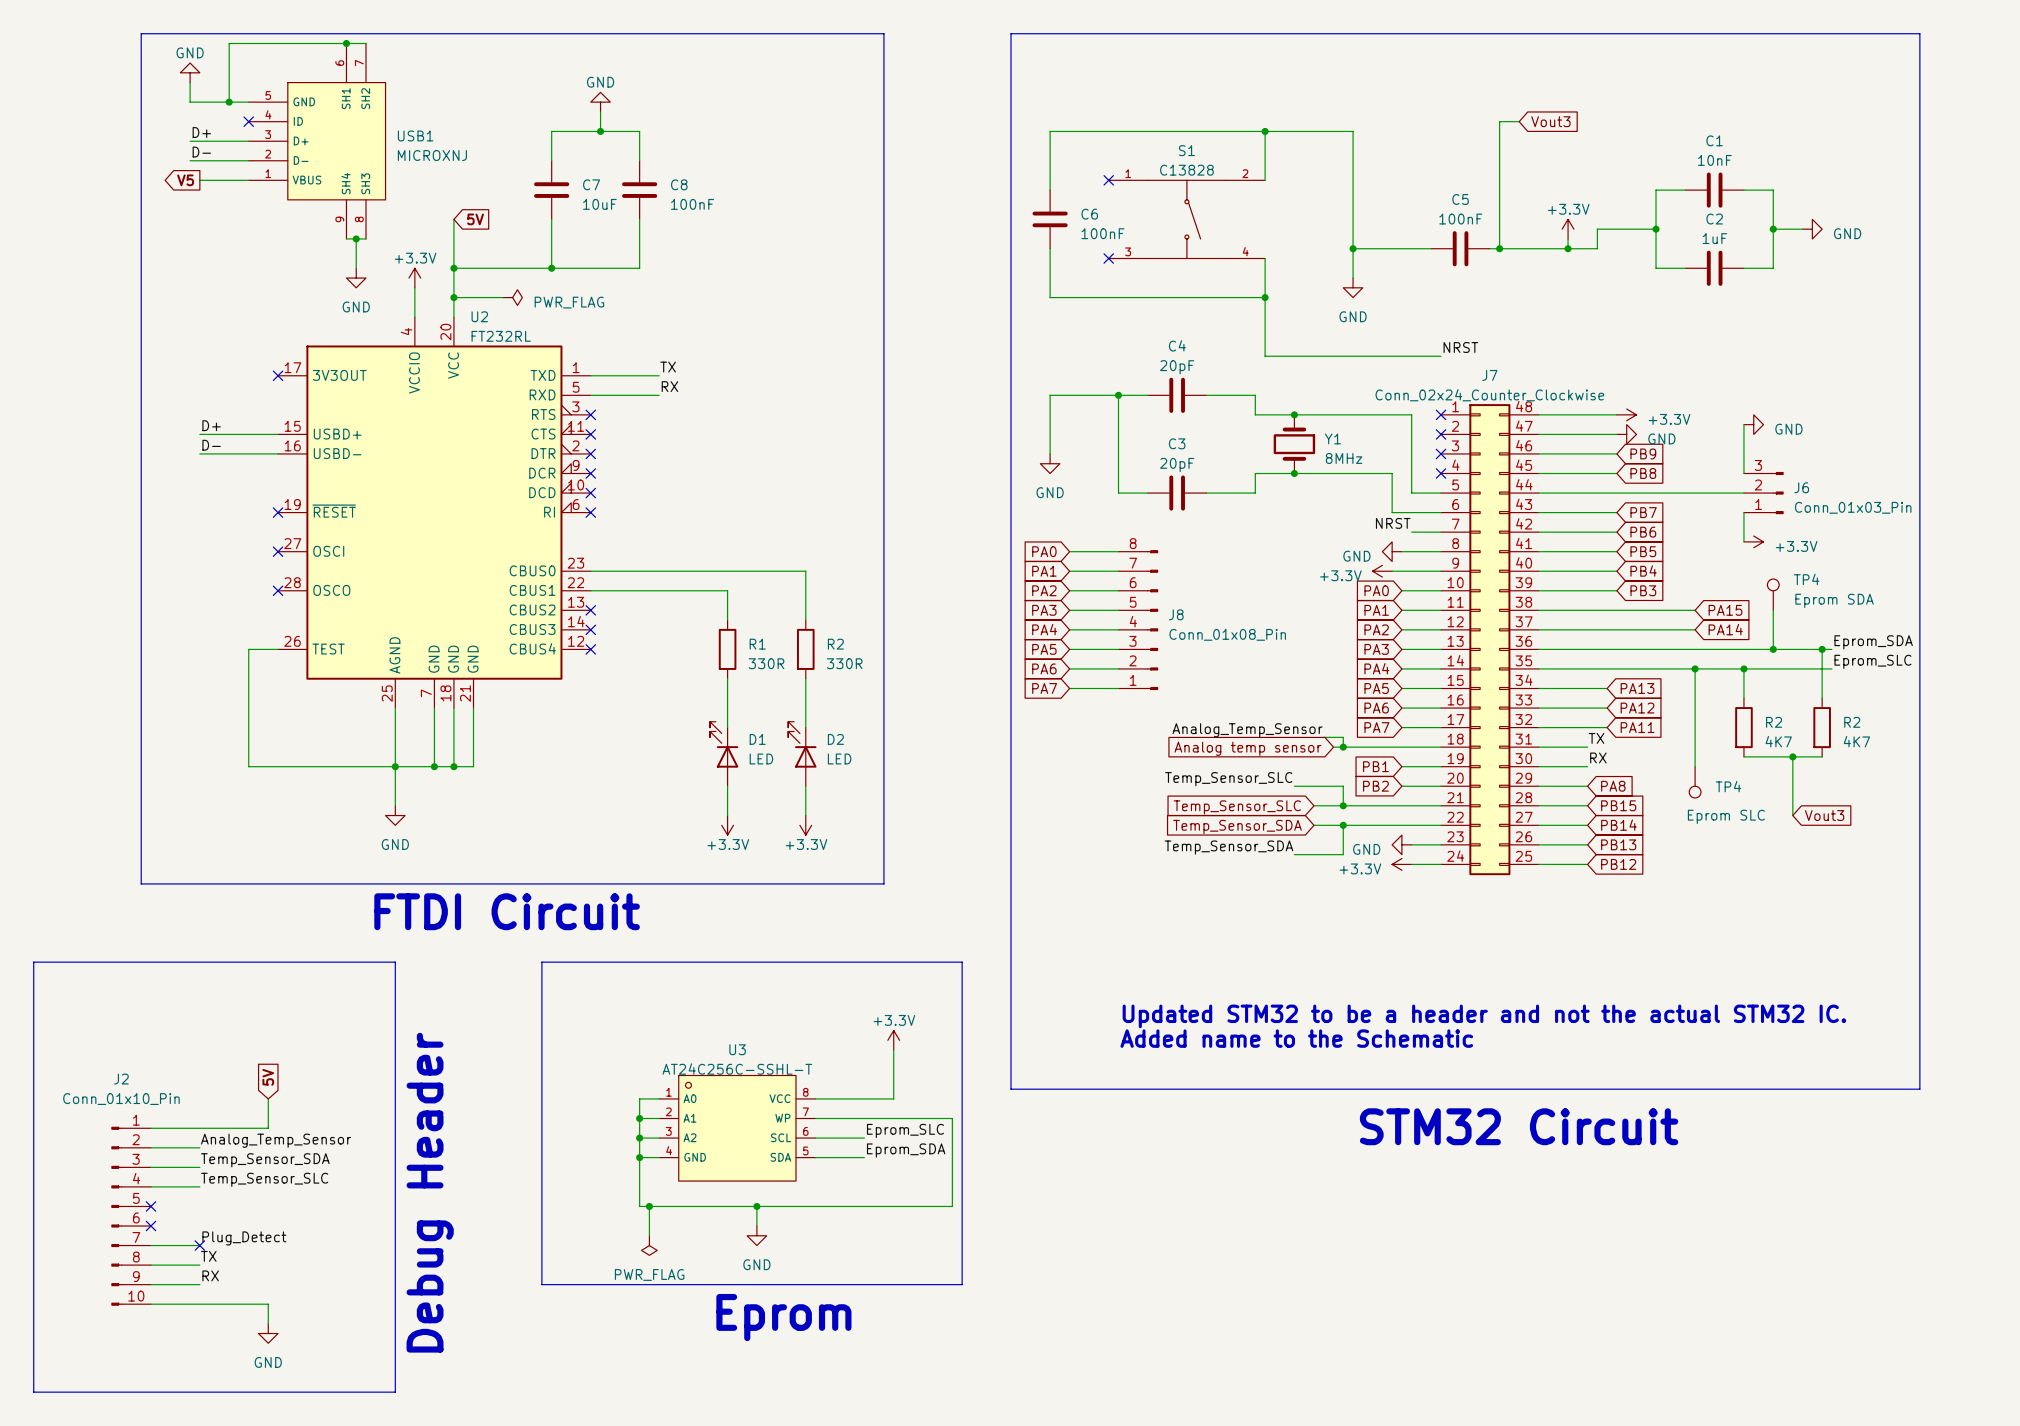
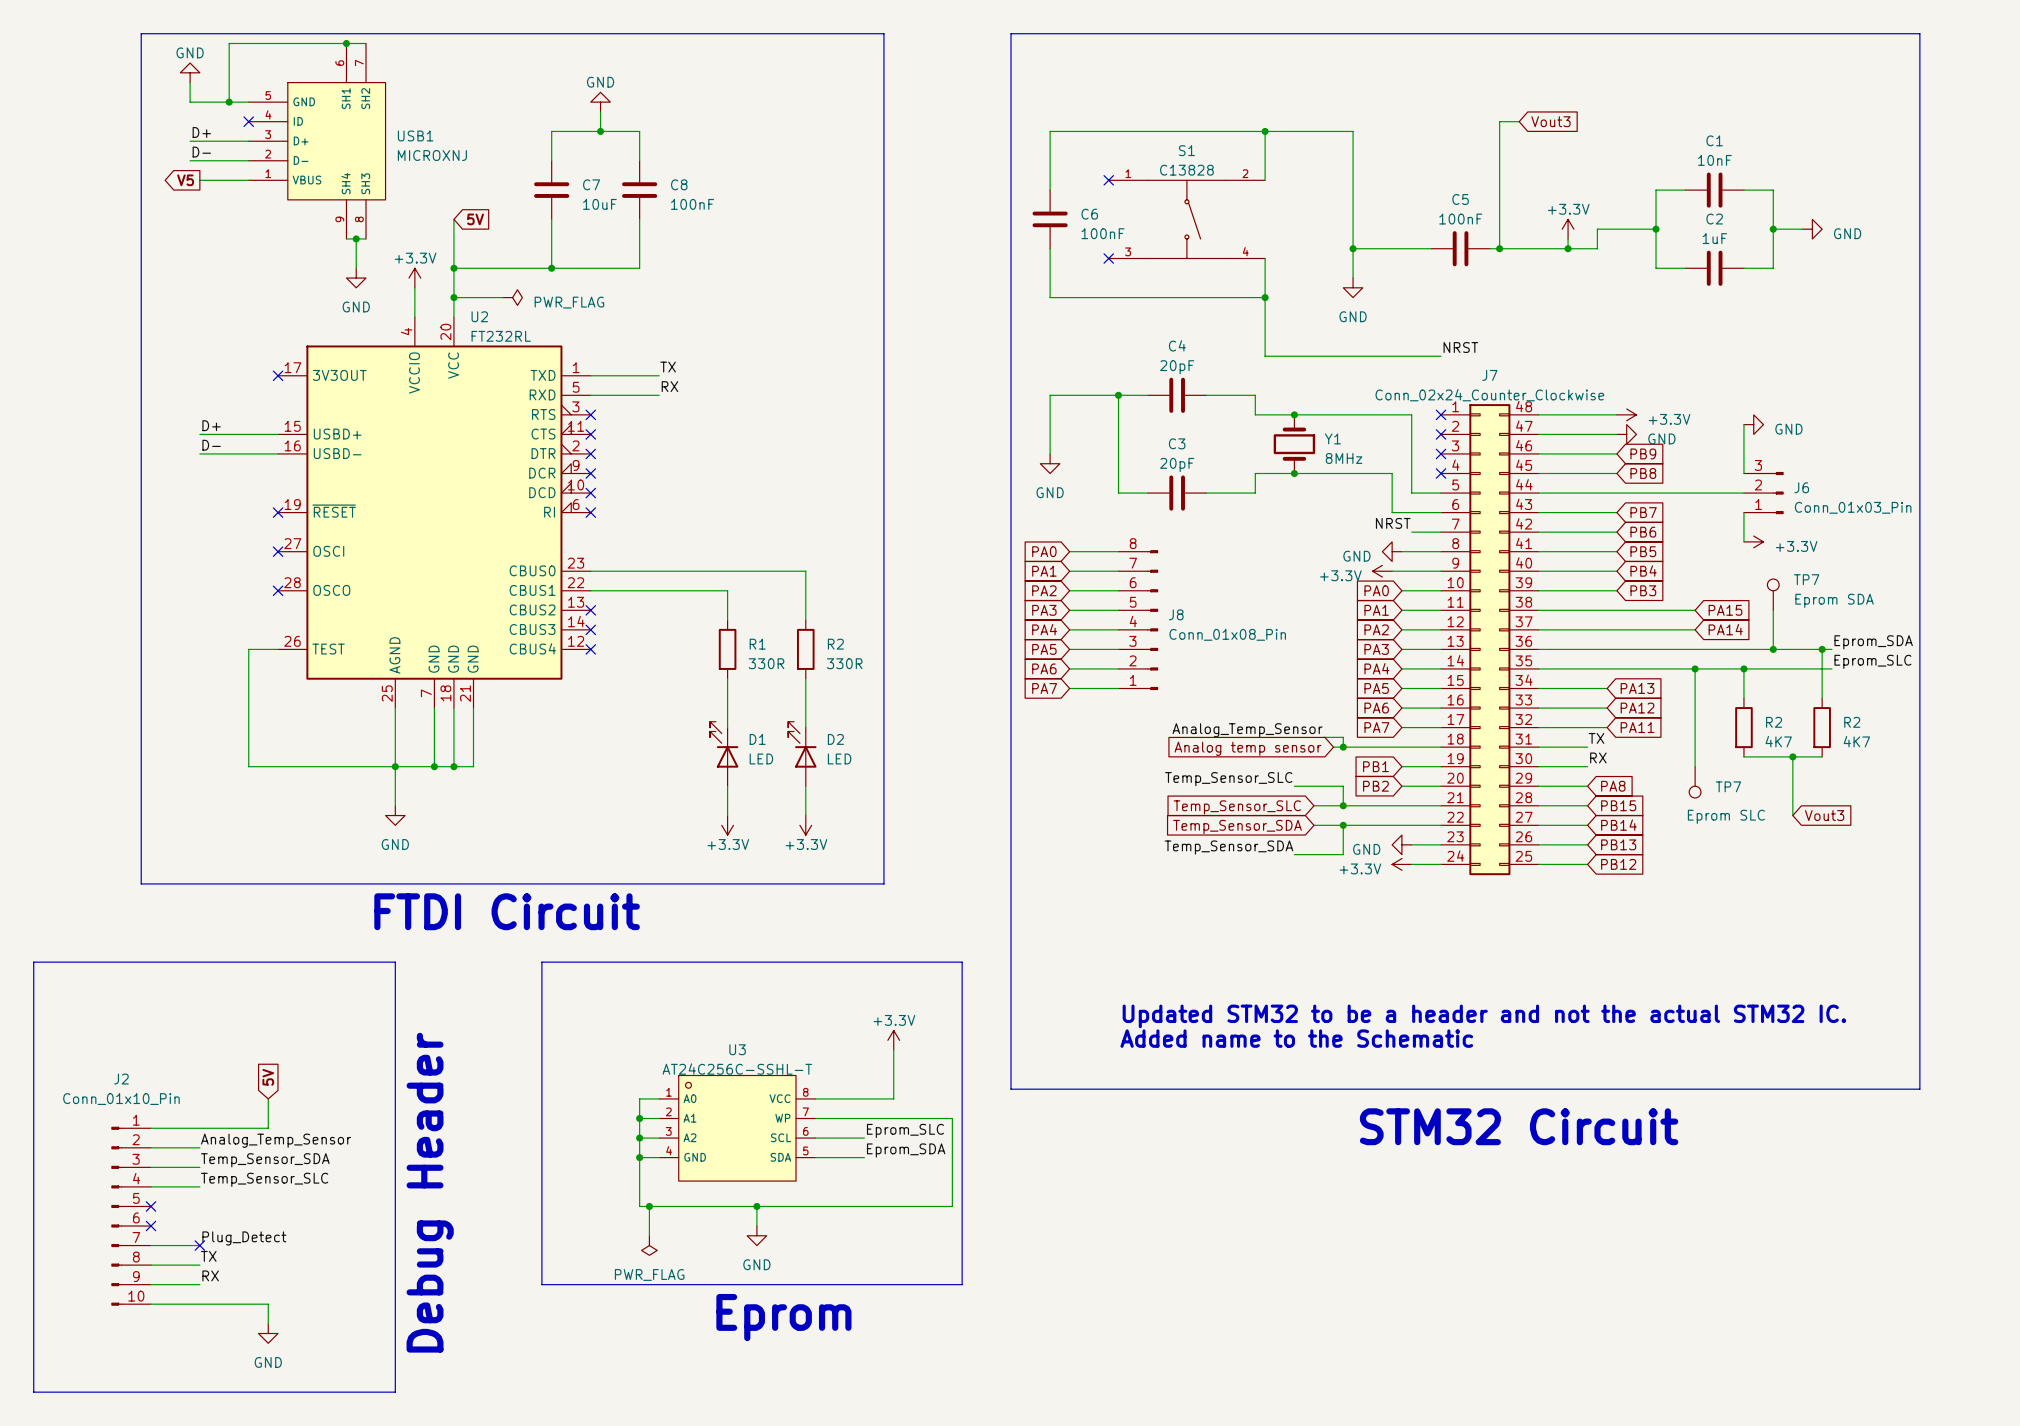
TP4 name: TP4 (1806, 579) -> TP7 (1806, 579)
TP4 name: TP4 (1728, 786) -> TP7 (1728, 786)

